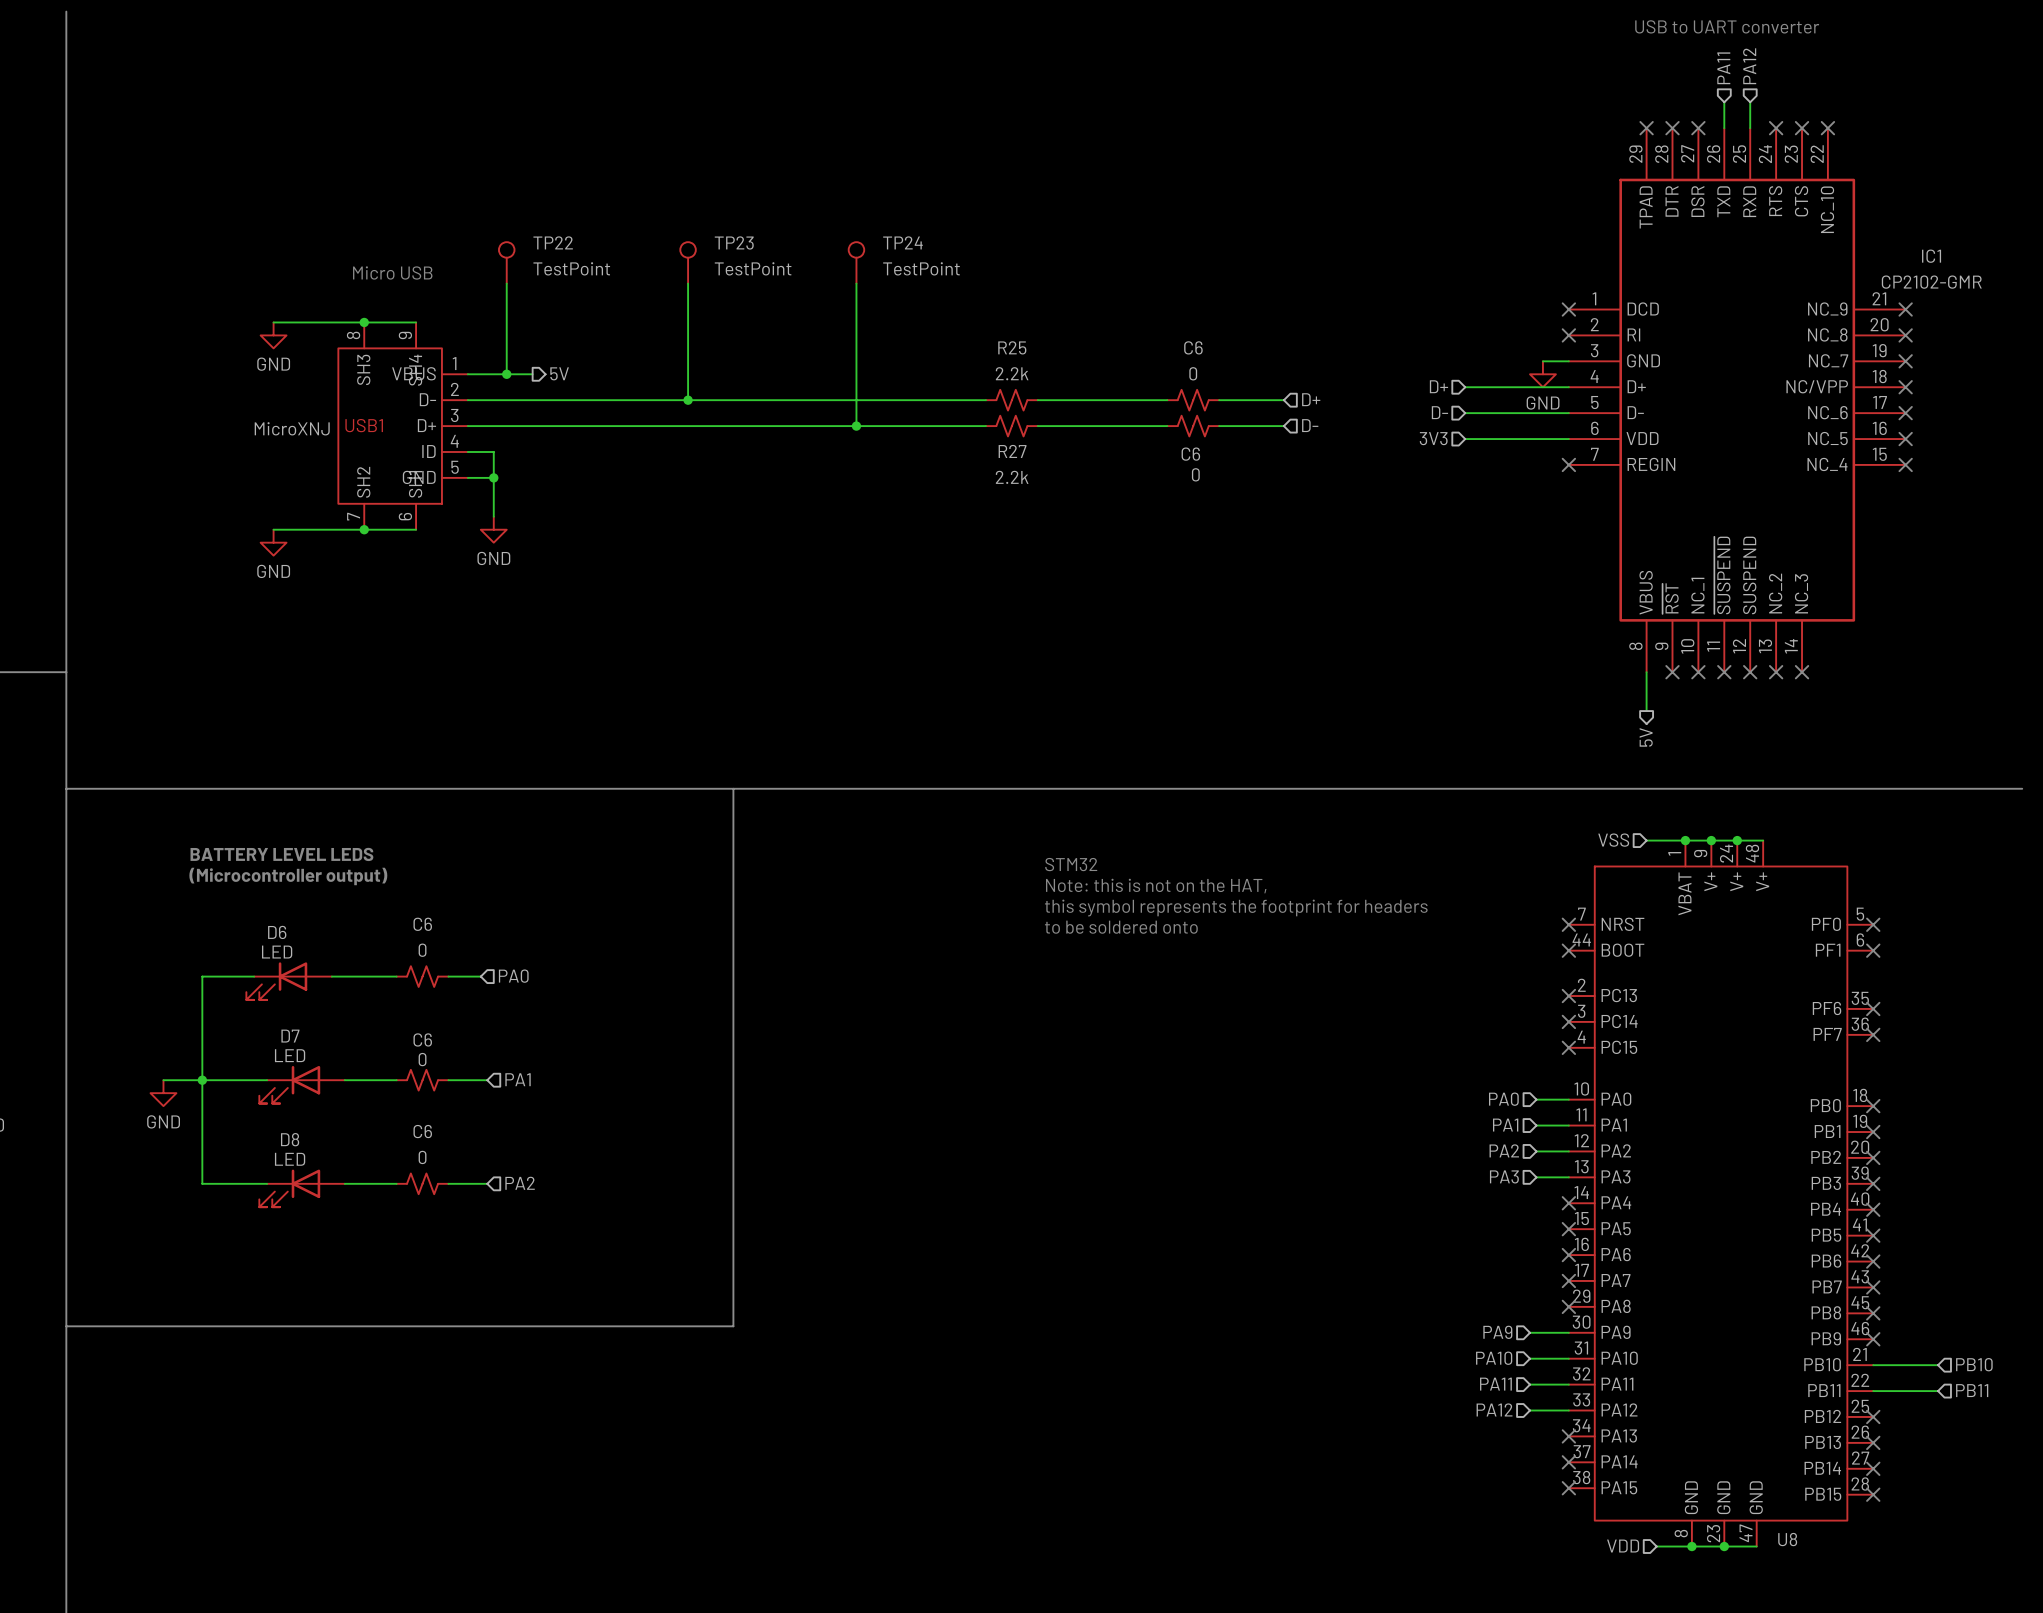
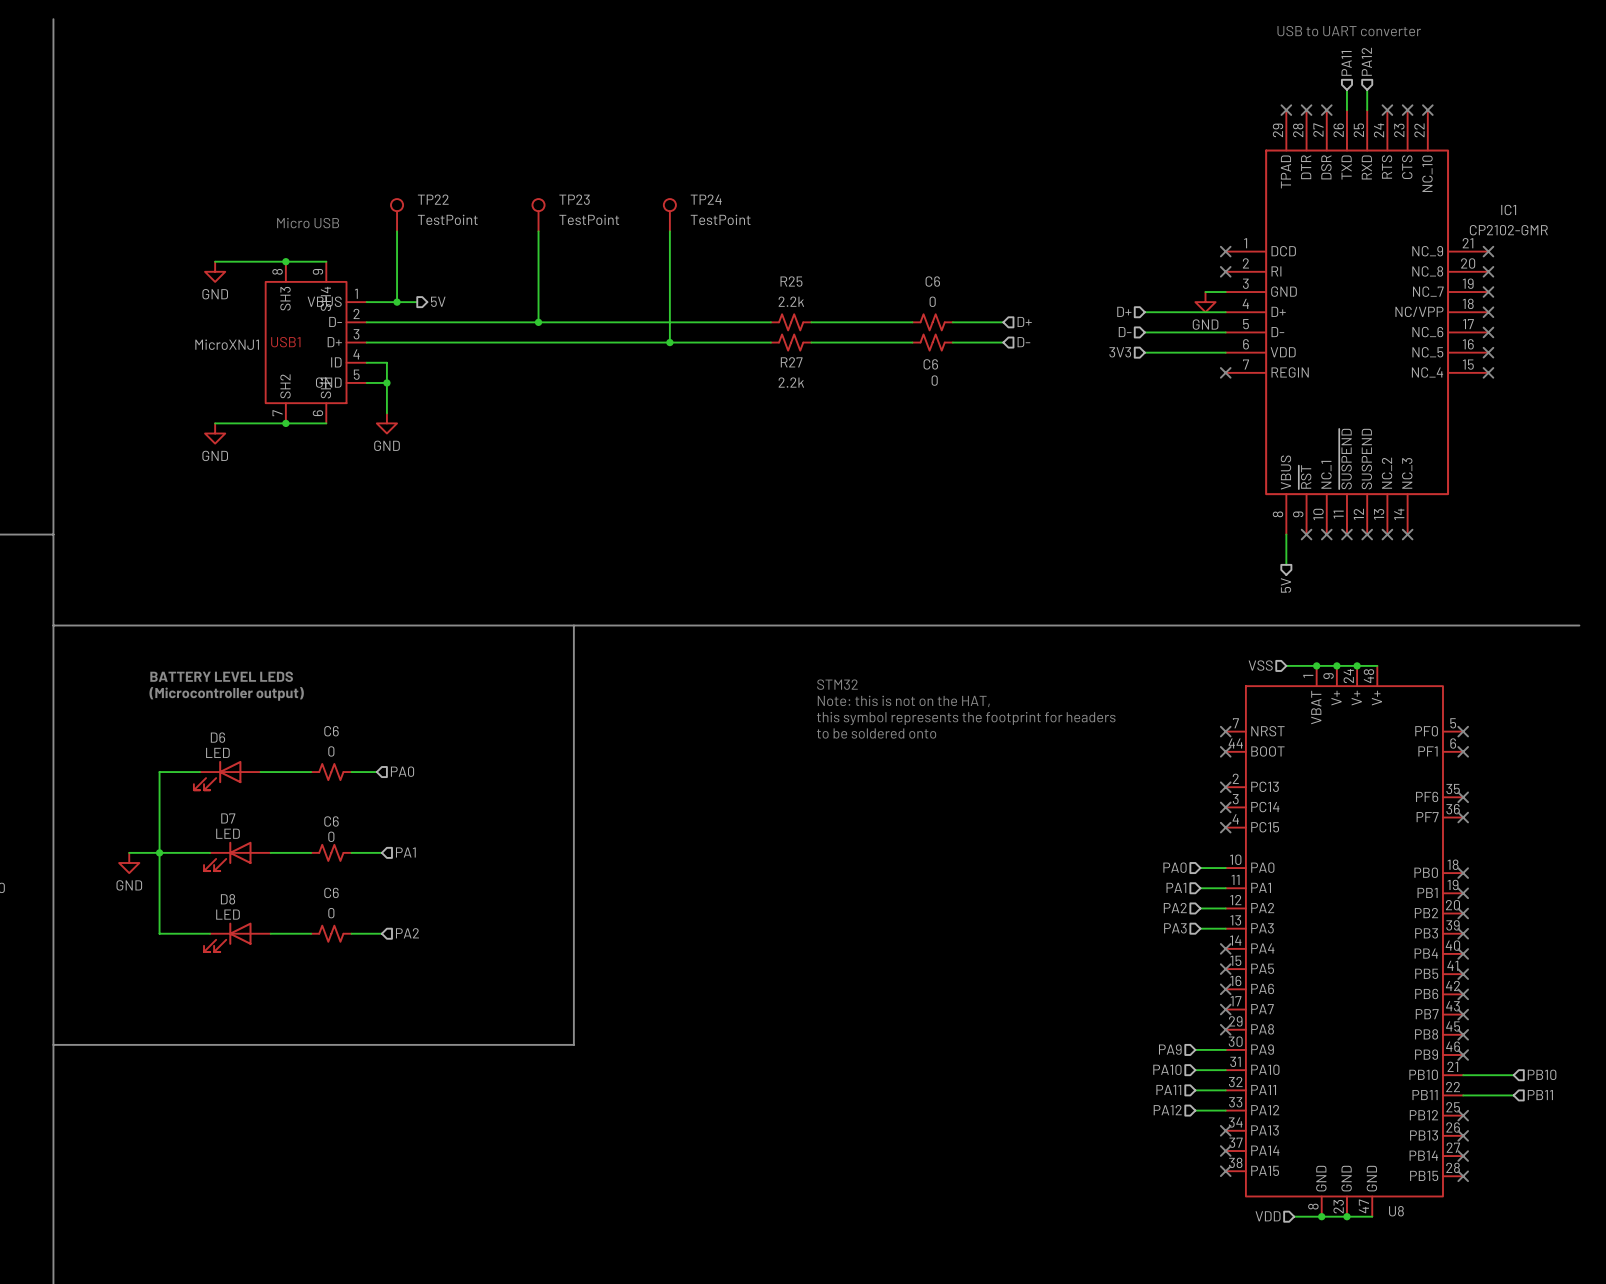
MicroXNJ name: MicroXNJ (292, 428) -> MicroXNJ1 (227, 344)

